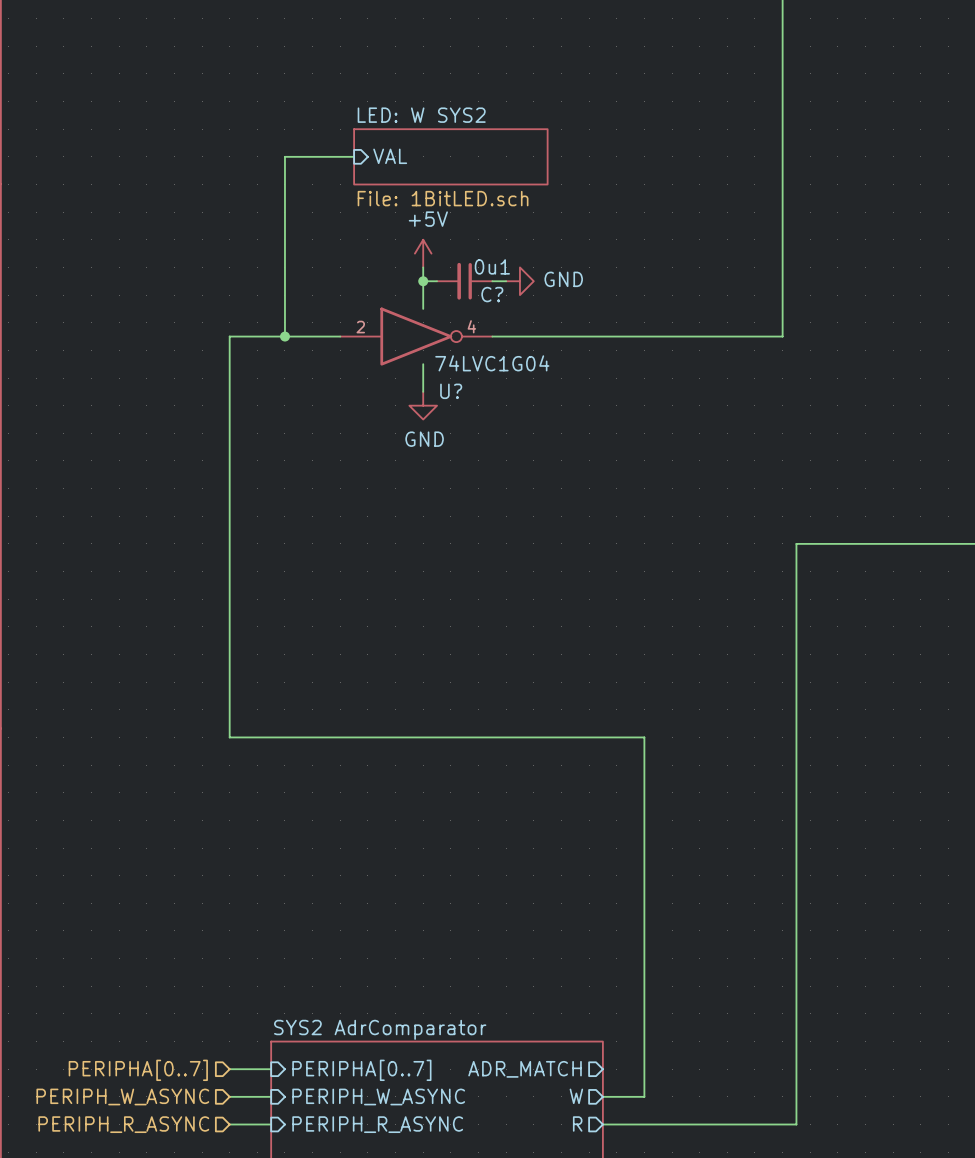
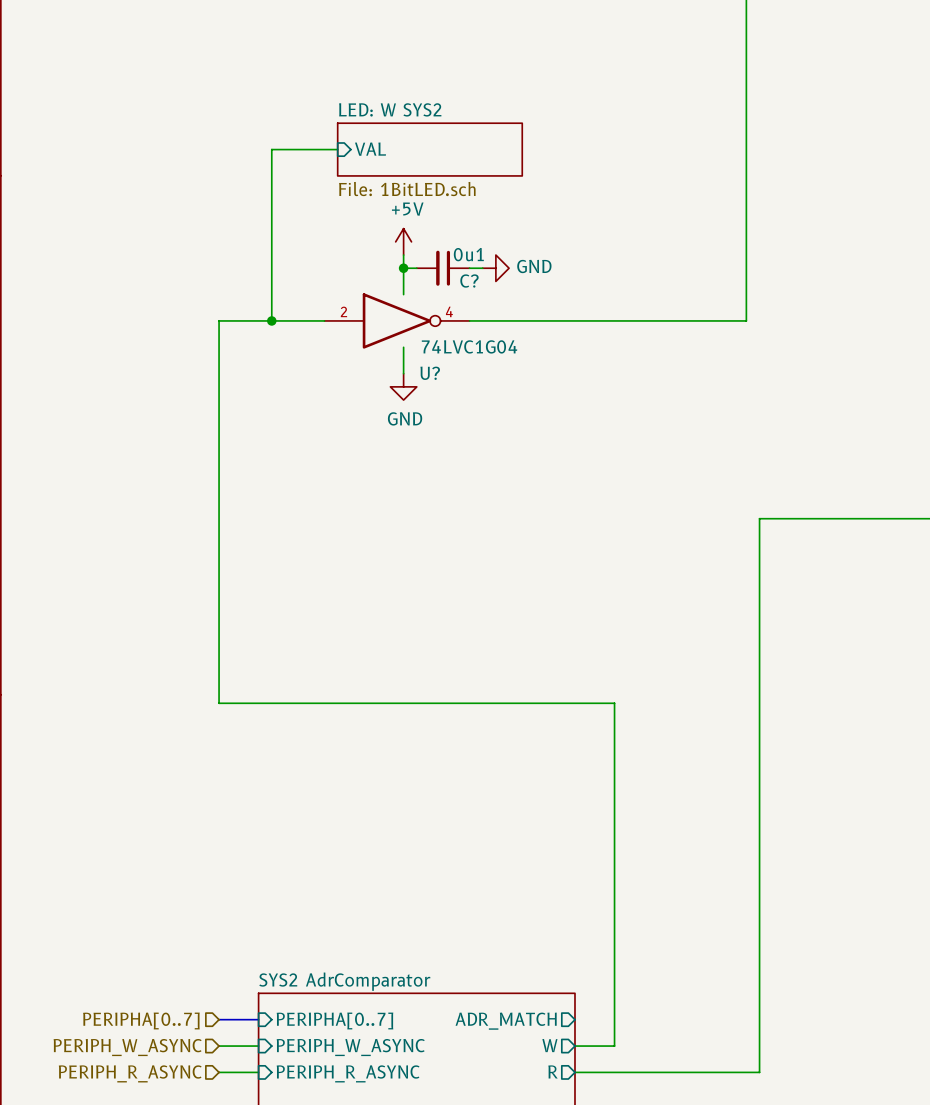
bus: none -> (219, 1019) (258, 1019)

